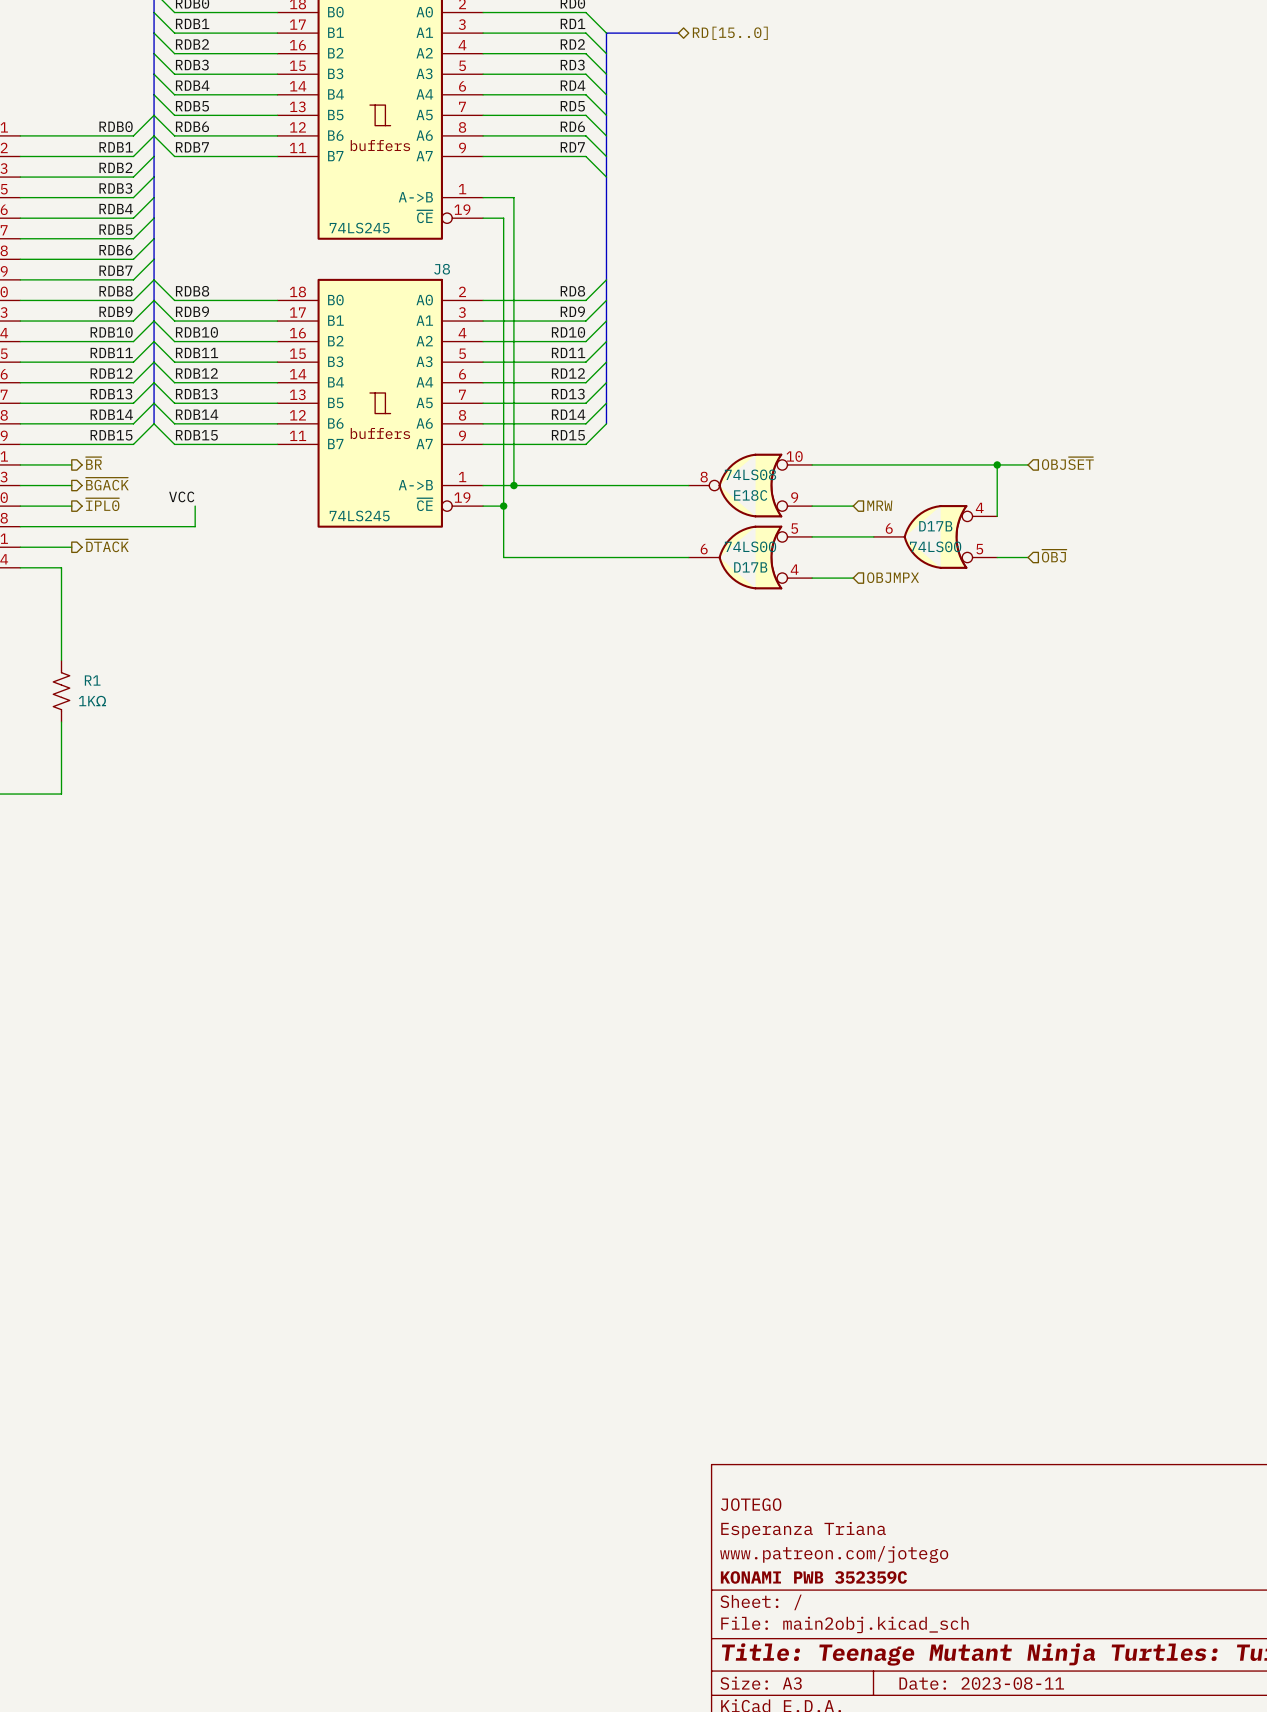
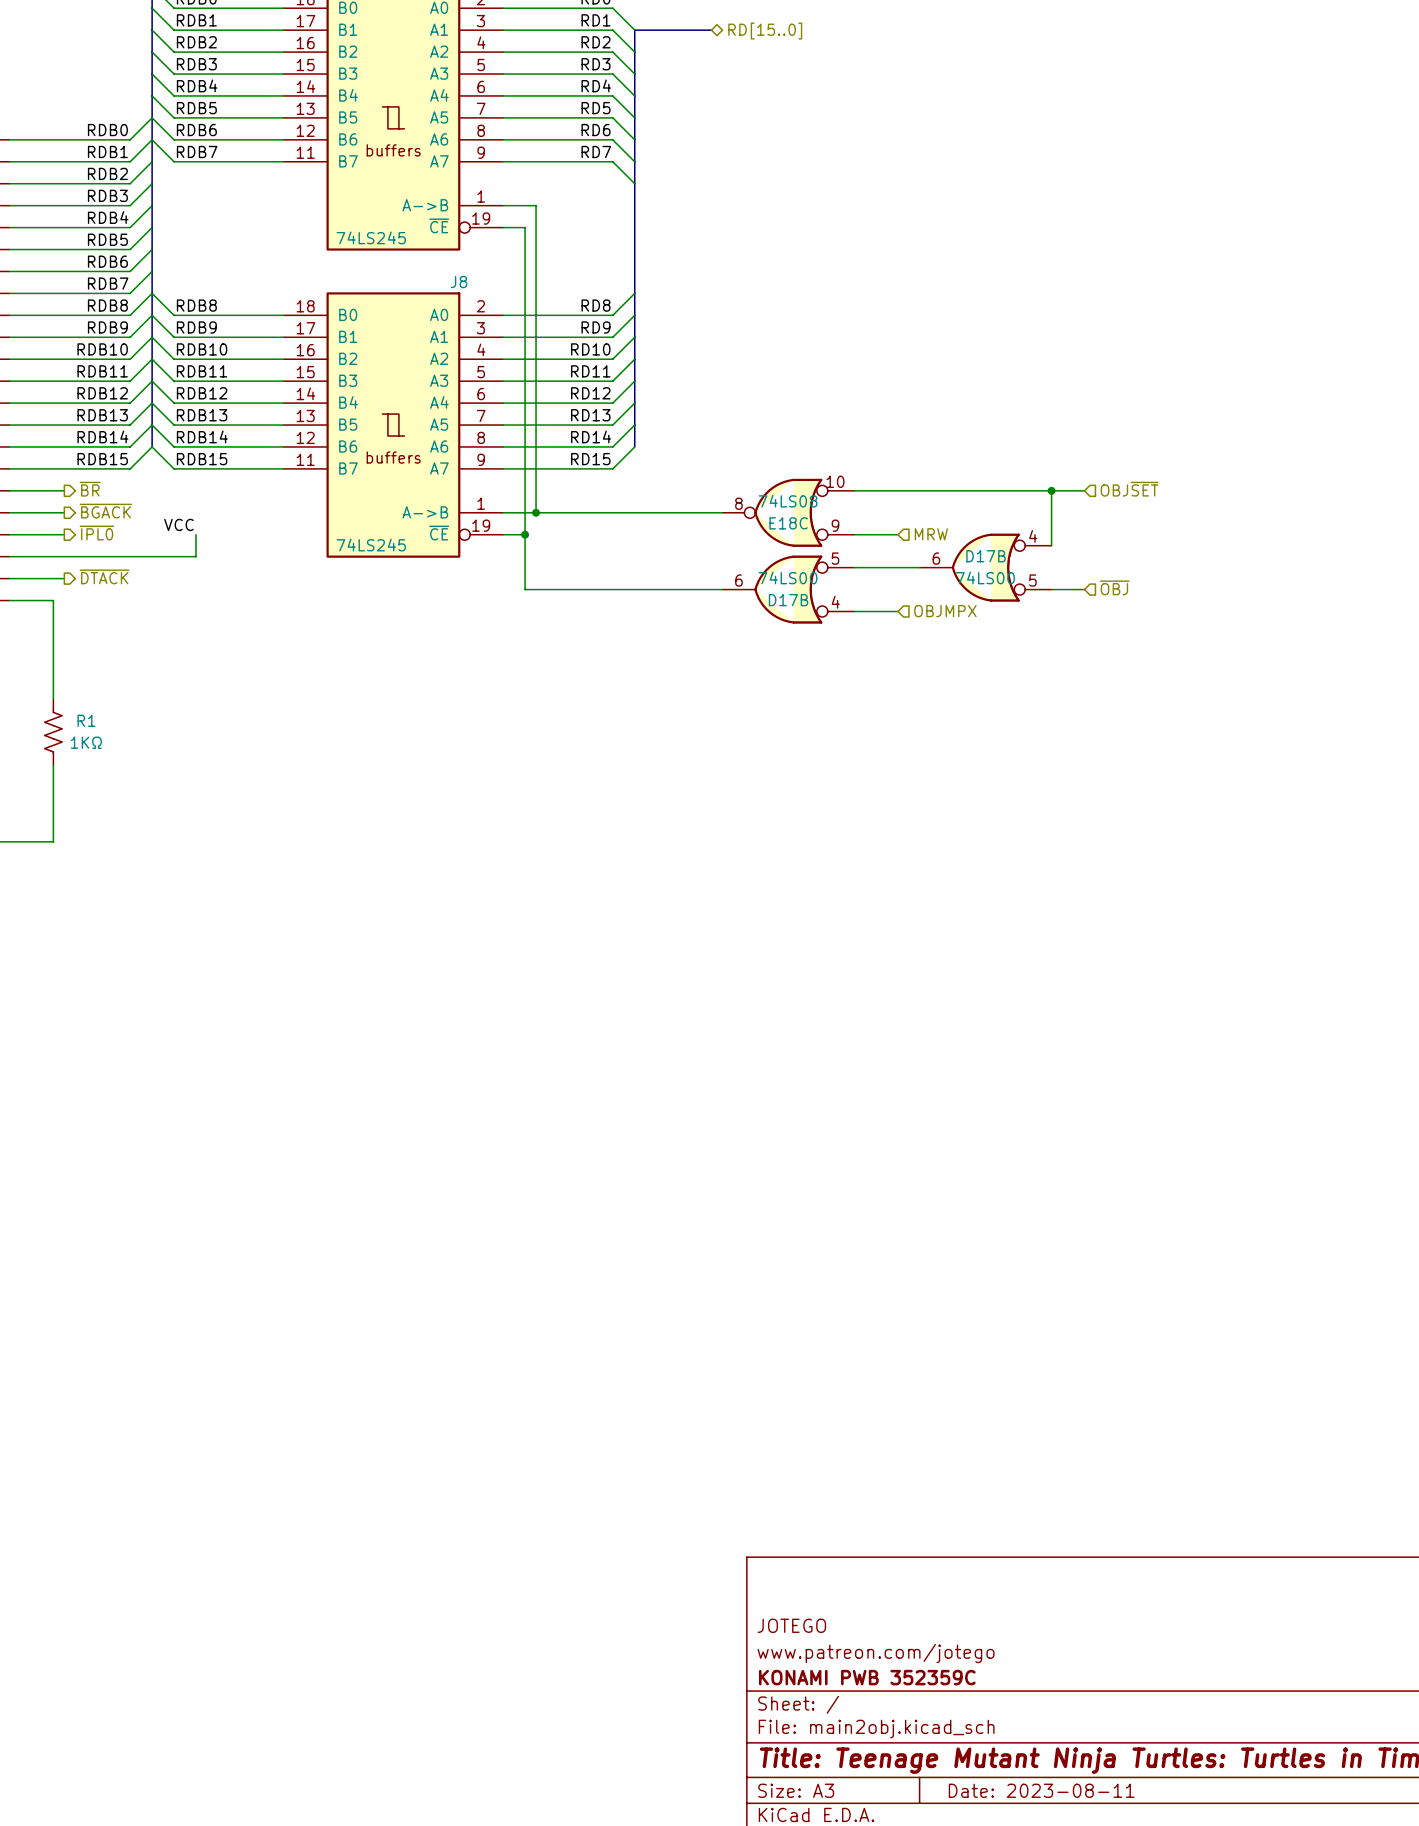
title block: JOTEGO (751, 1504) -> none
title block: Esperanza Triana (803, 1530) -> JOTEGO (791, 1625)

